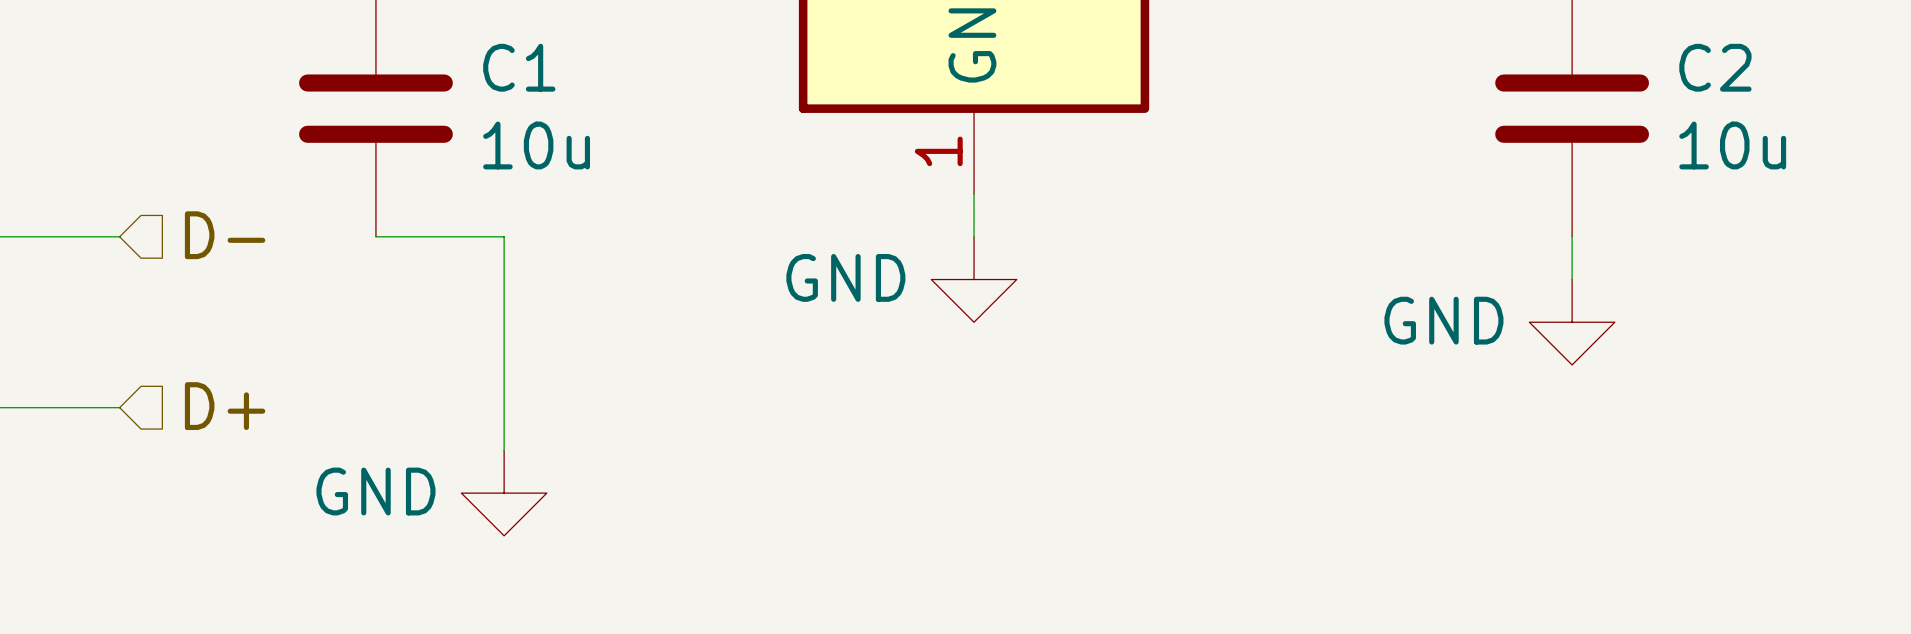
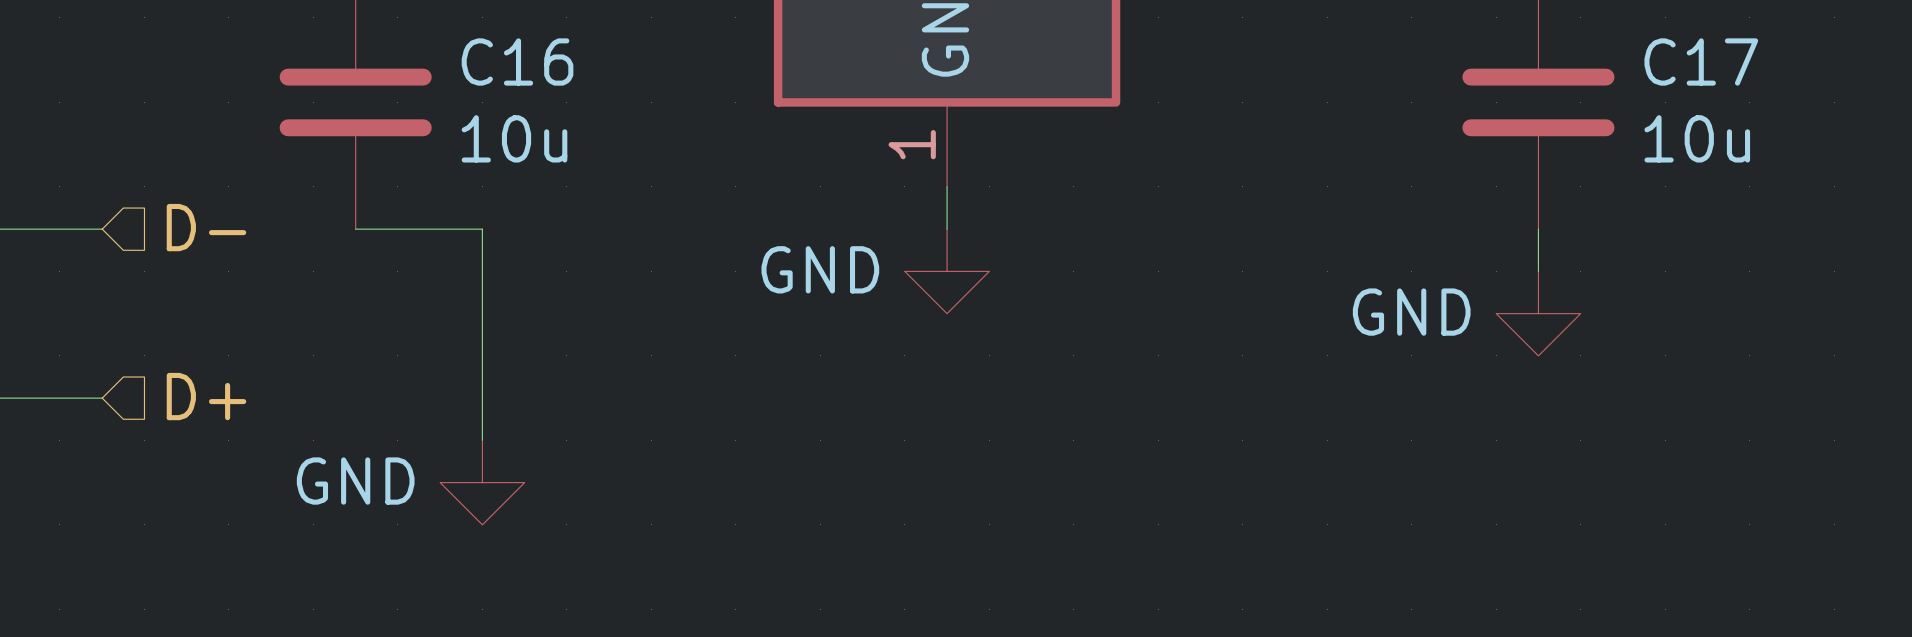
C1 name: C1 (519, 67) -> C16 (517, 62)
C2 name: C2 (1715, 67) -> C17 (1701, 62)

